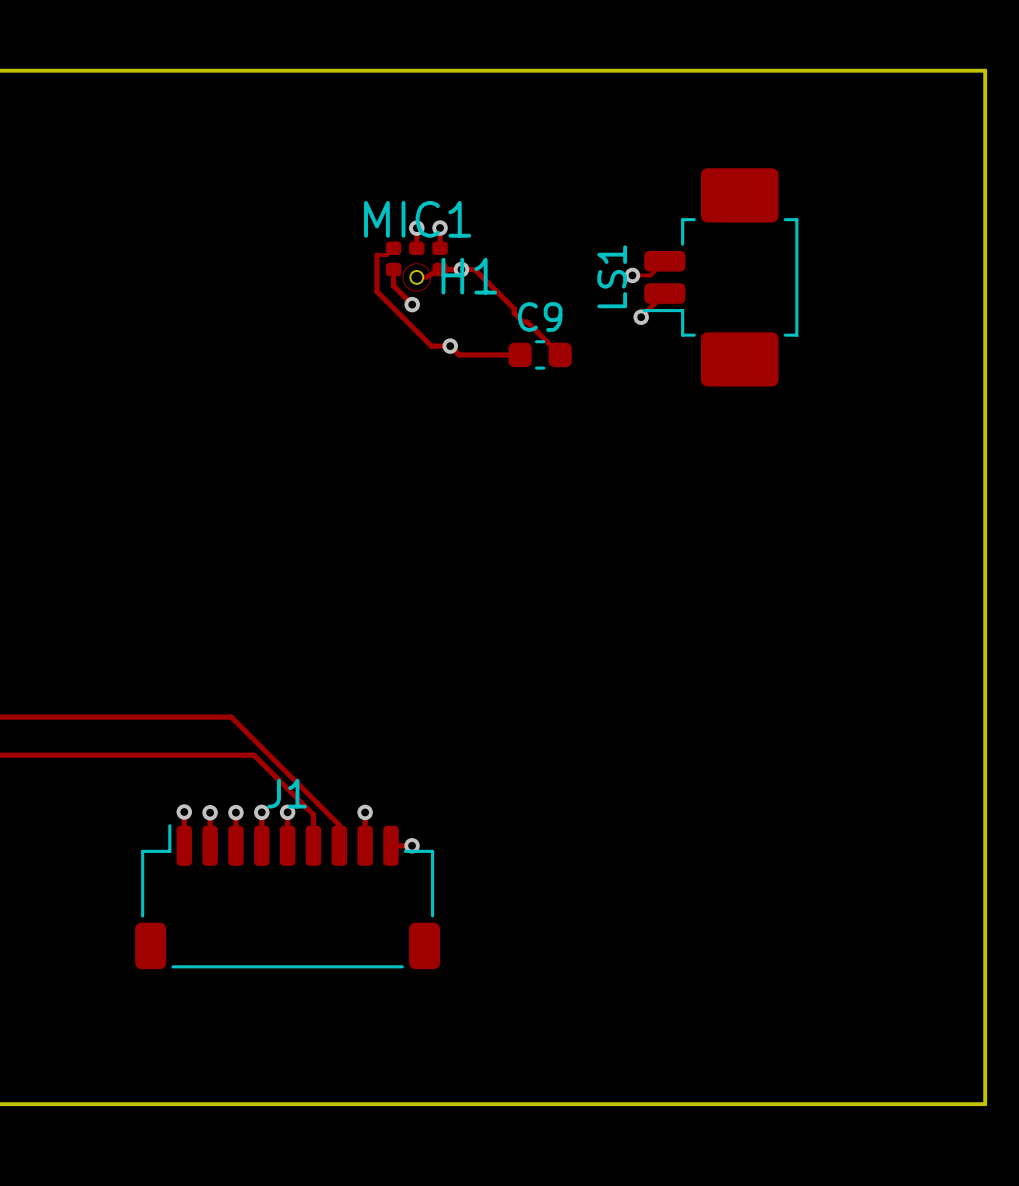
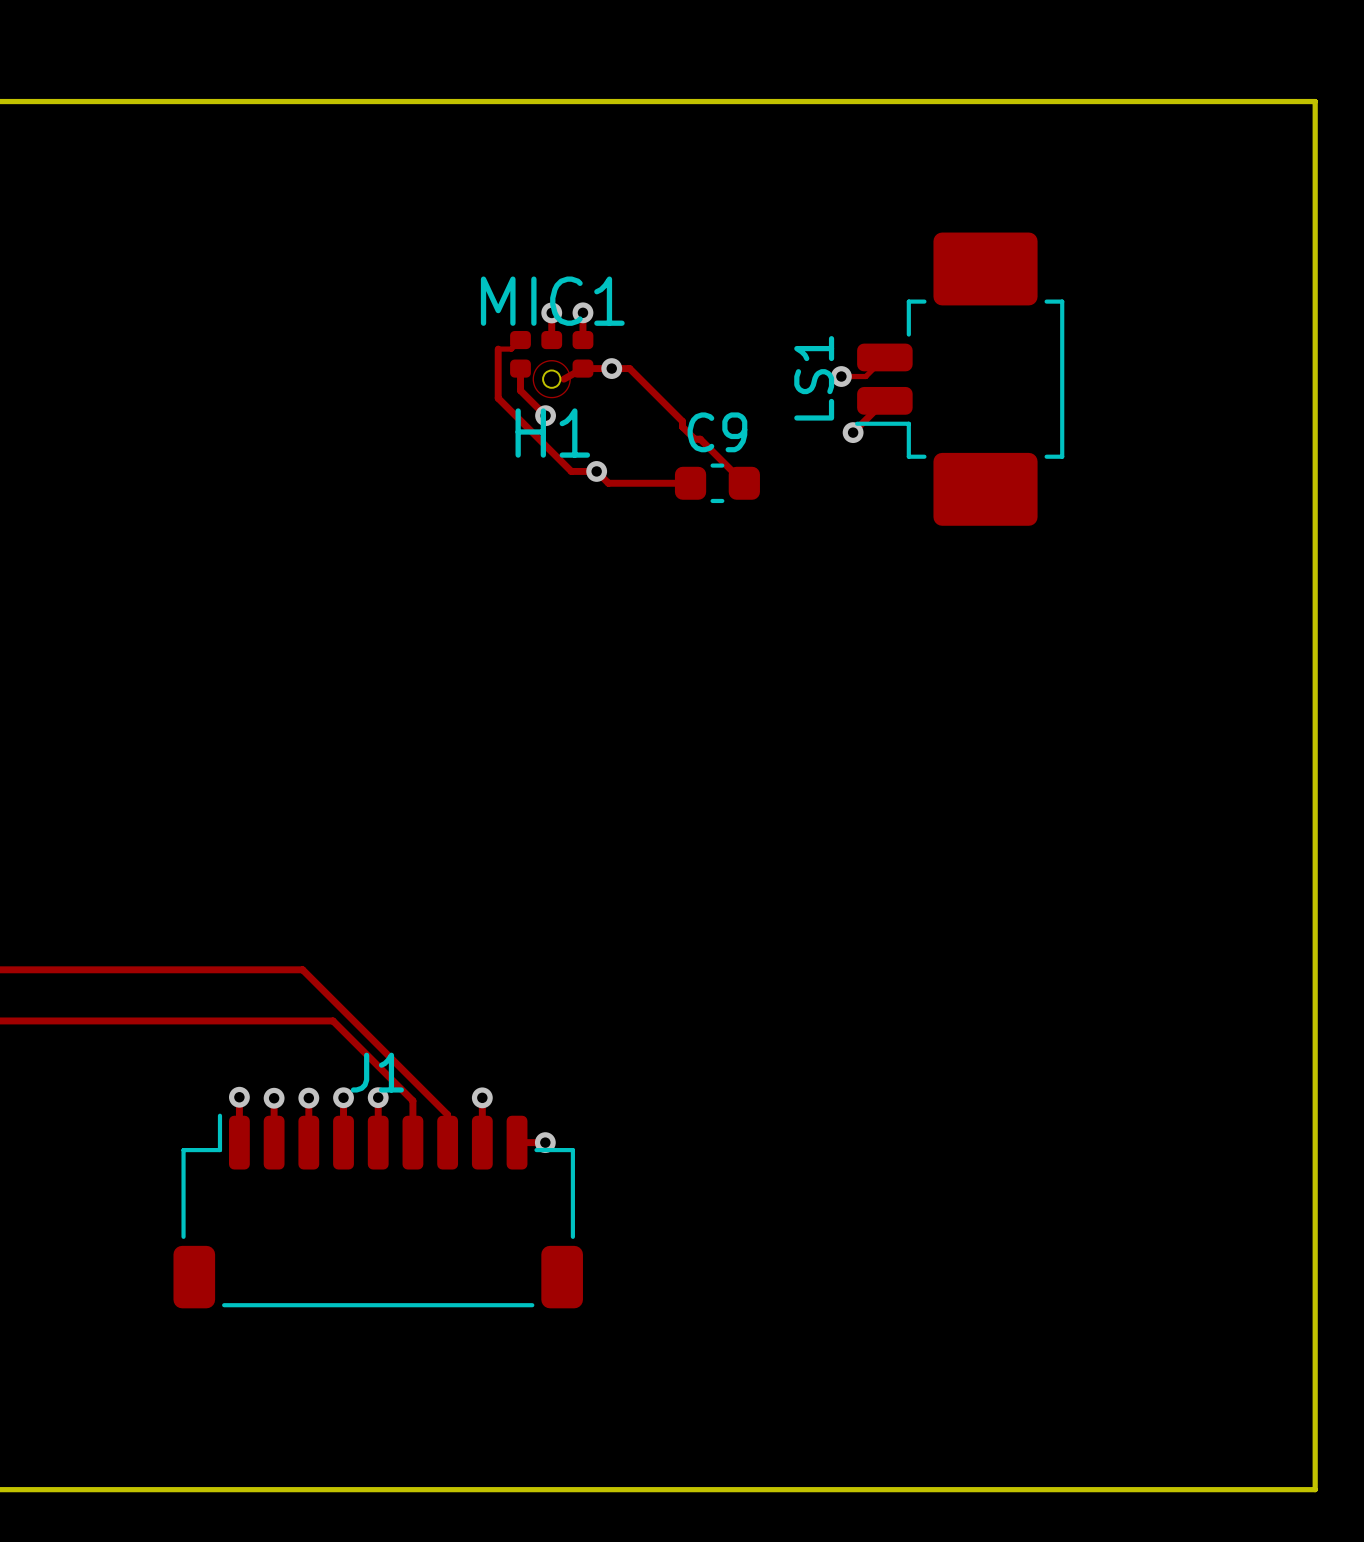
H1 name position: H1 (469, 276) -> H1 (552, 433)

